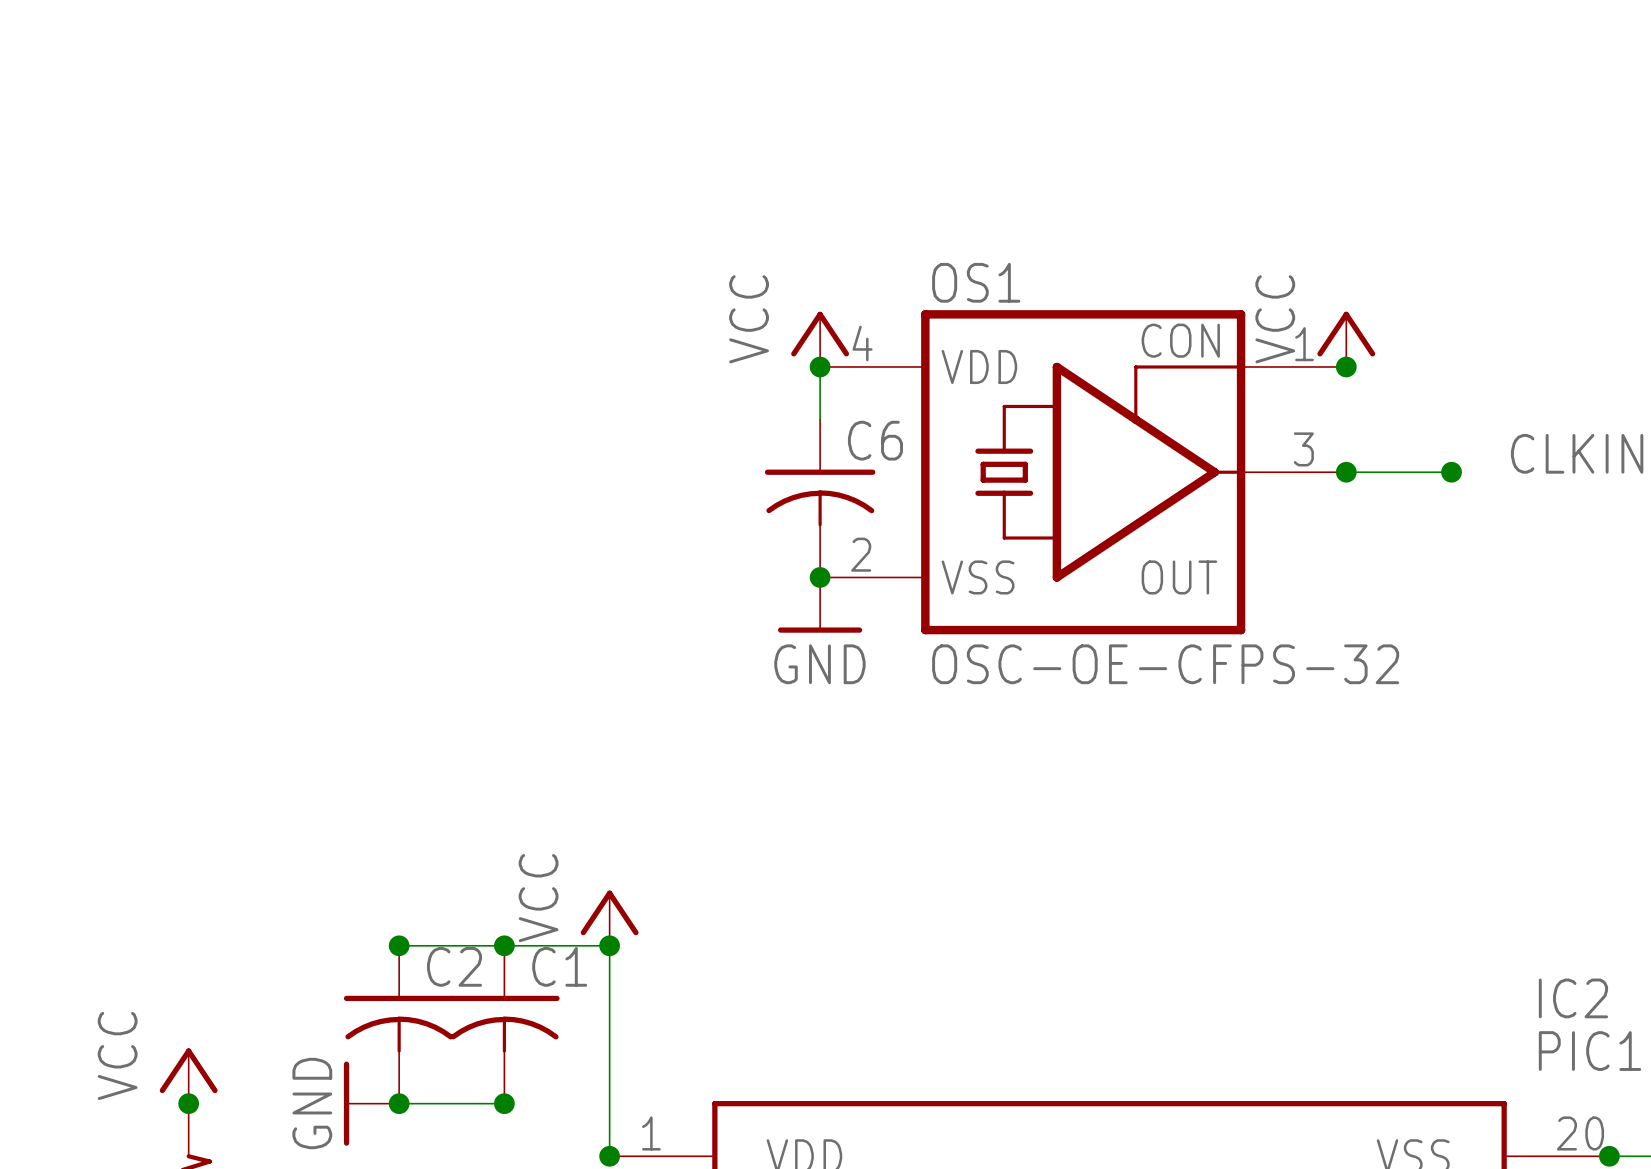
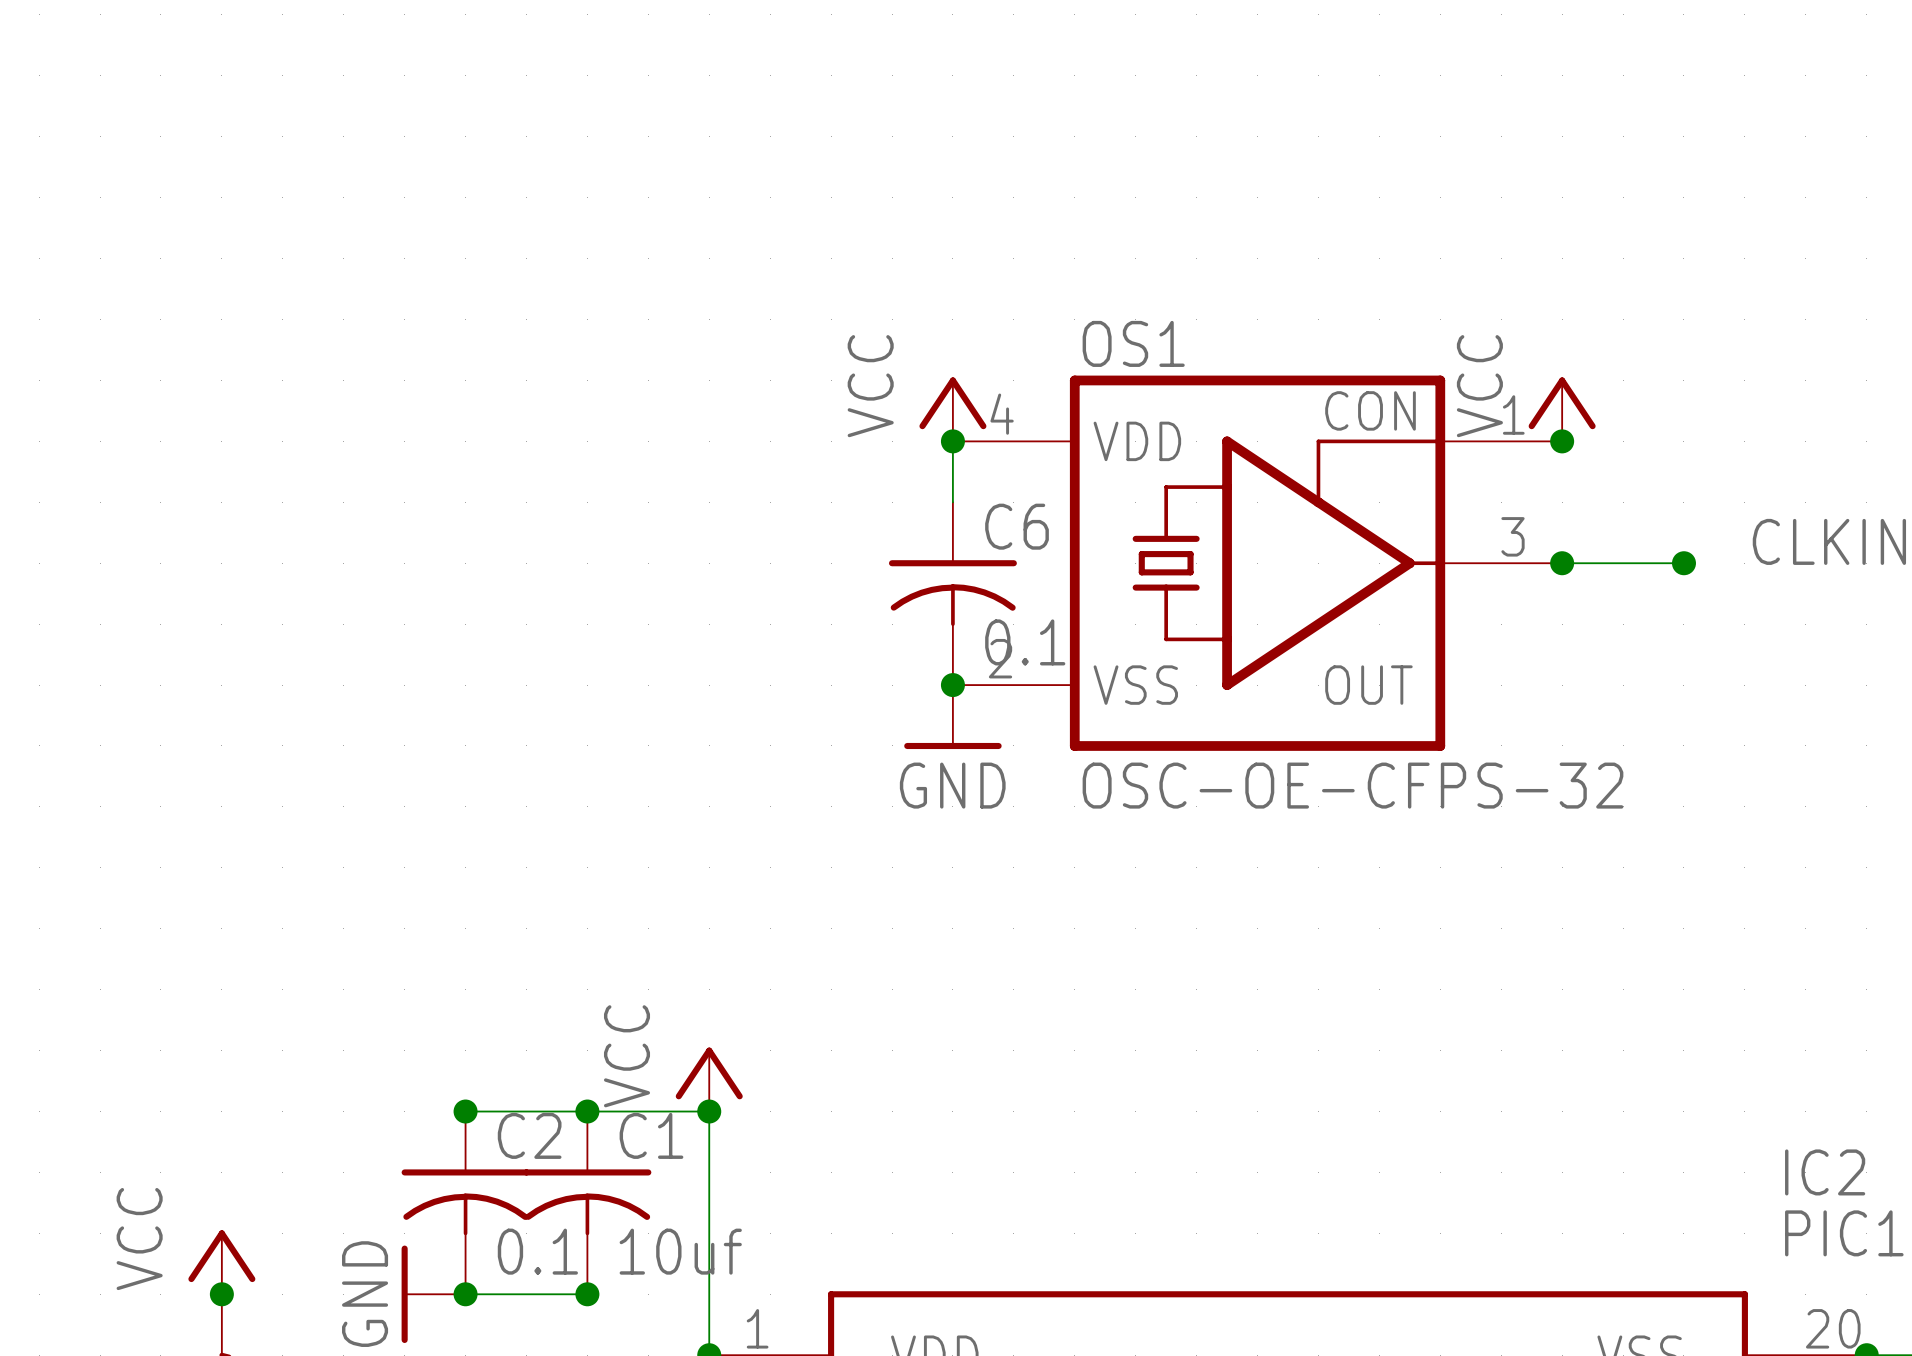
C6 value: none -> 0.1 (1025, 642)
C2 value: none -> 0.1 (537, 1251)
C1 value: none -> 10uf (680, 1251)

